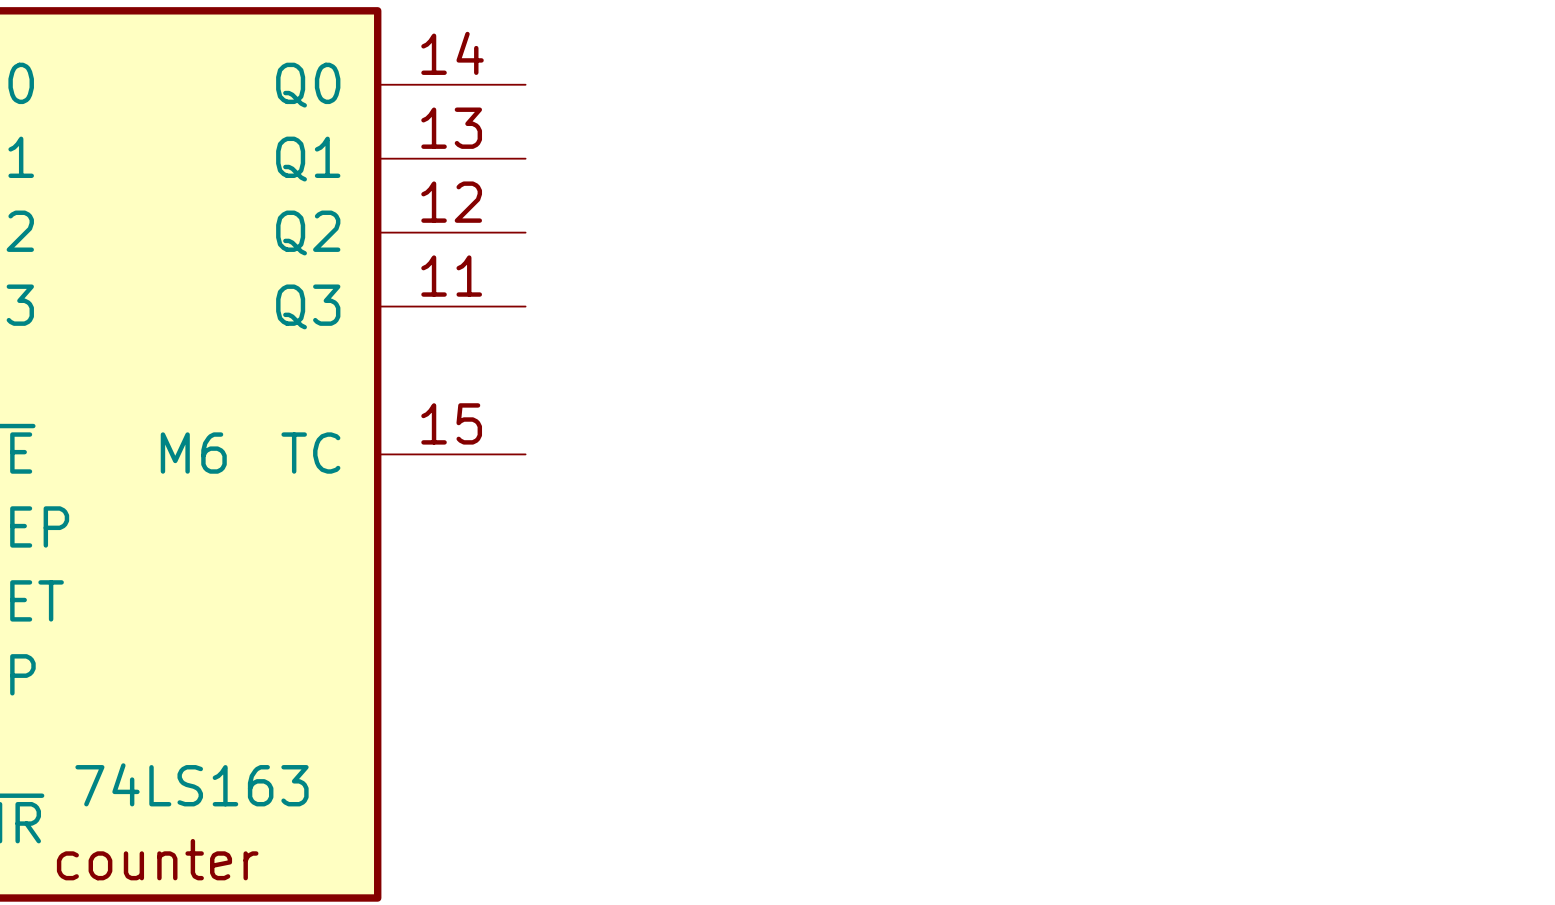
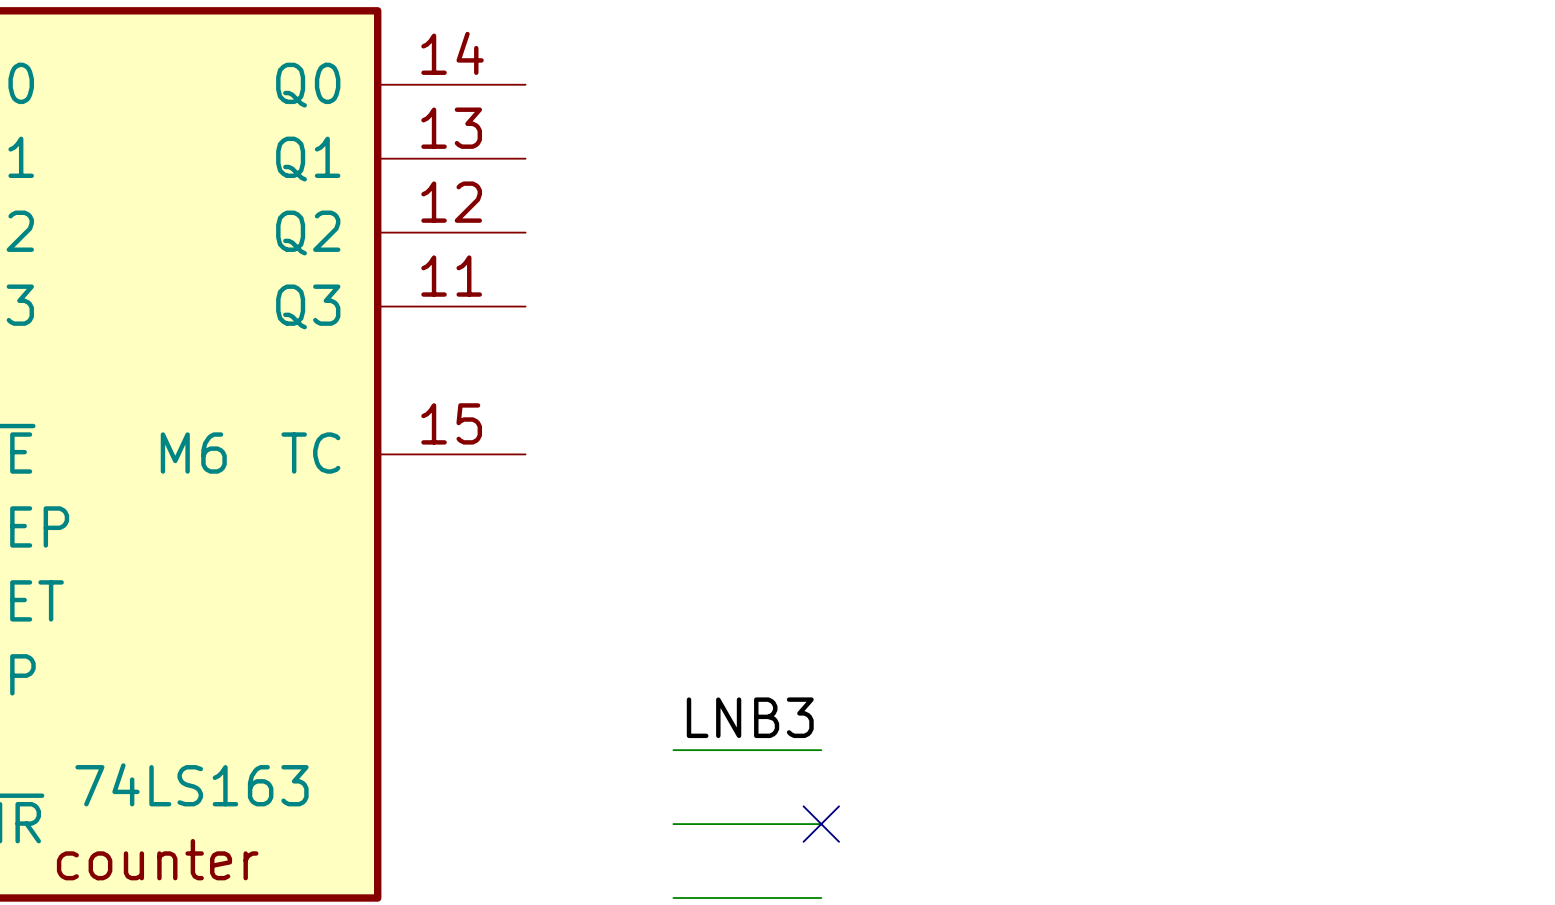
label: none -> LNB3 (750, 717)
wire: none -> (673, 750) (821, 750)
wire: none -> (673, 824) (821, 824)
no-connect mark: none -> (821, 824)
wire: none -> (673, 898) (821, 898)

